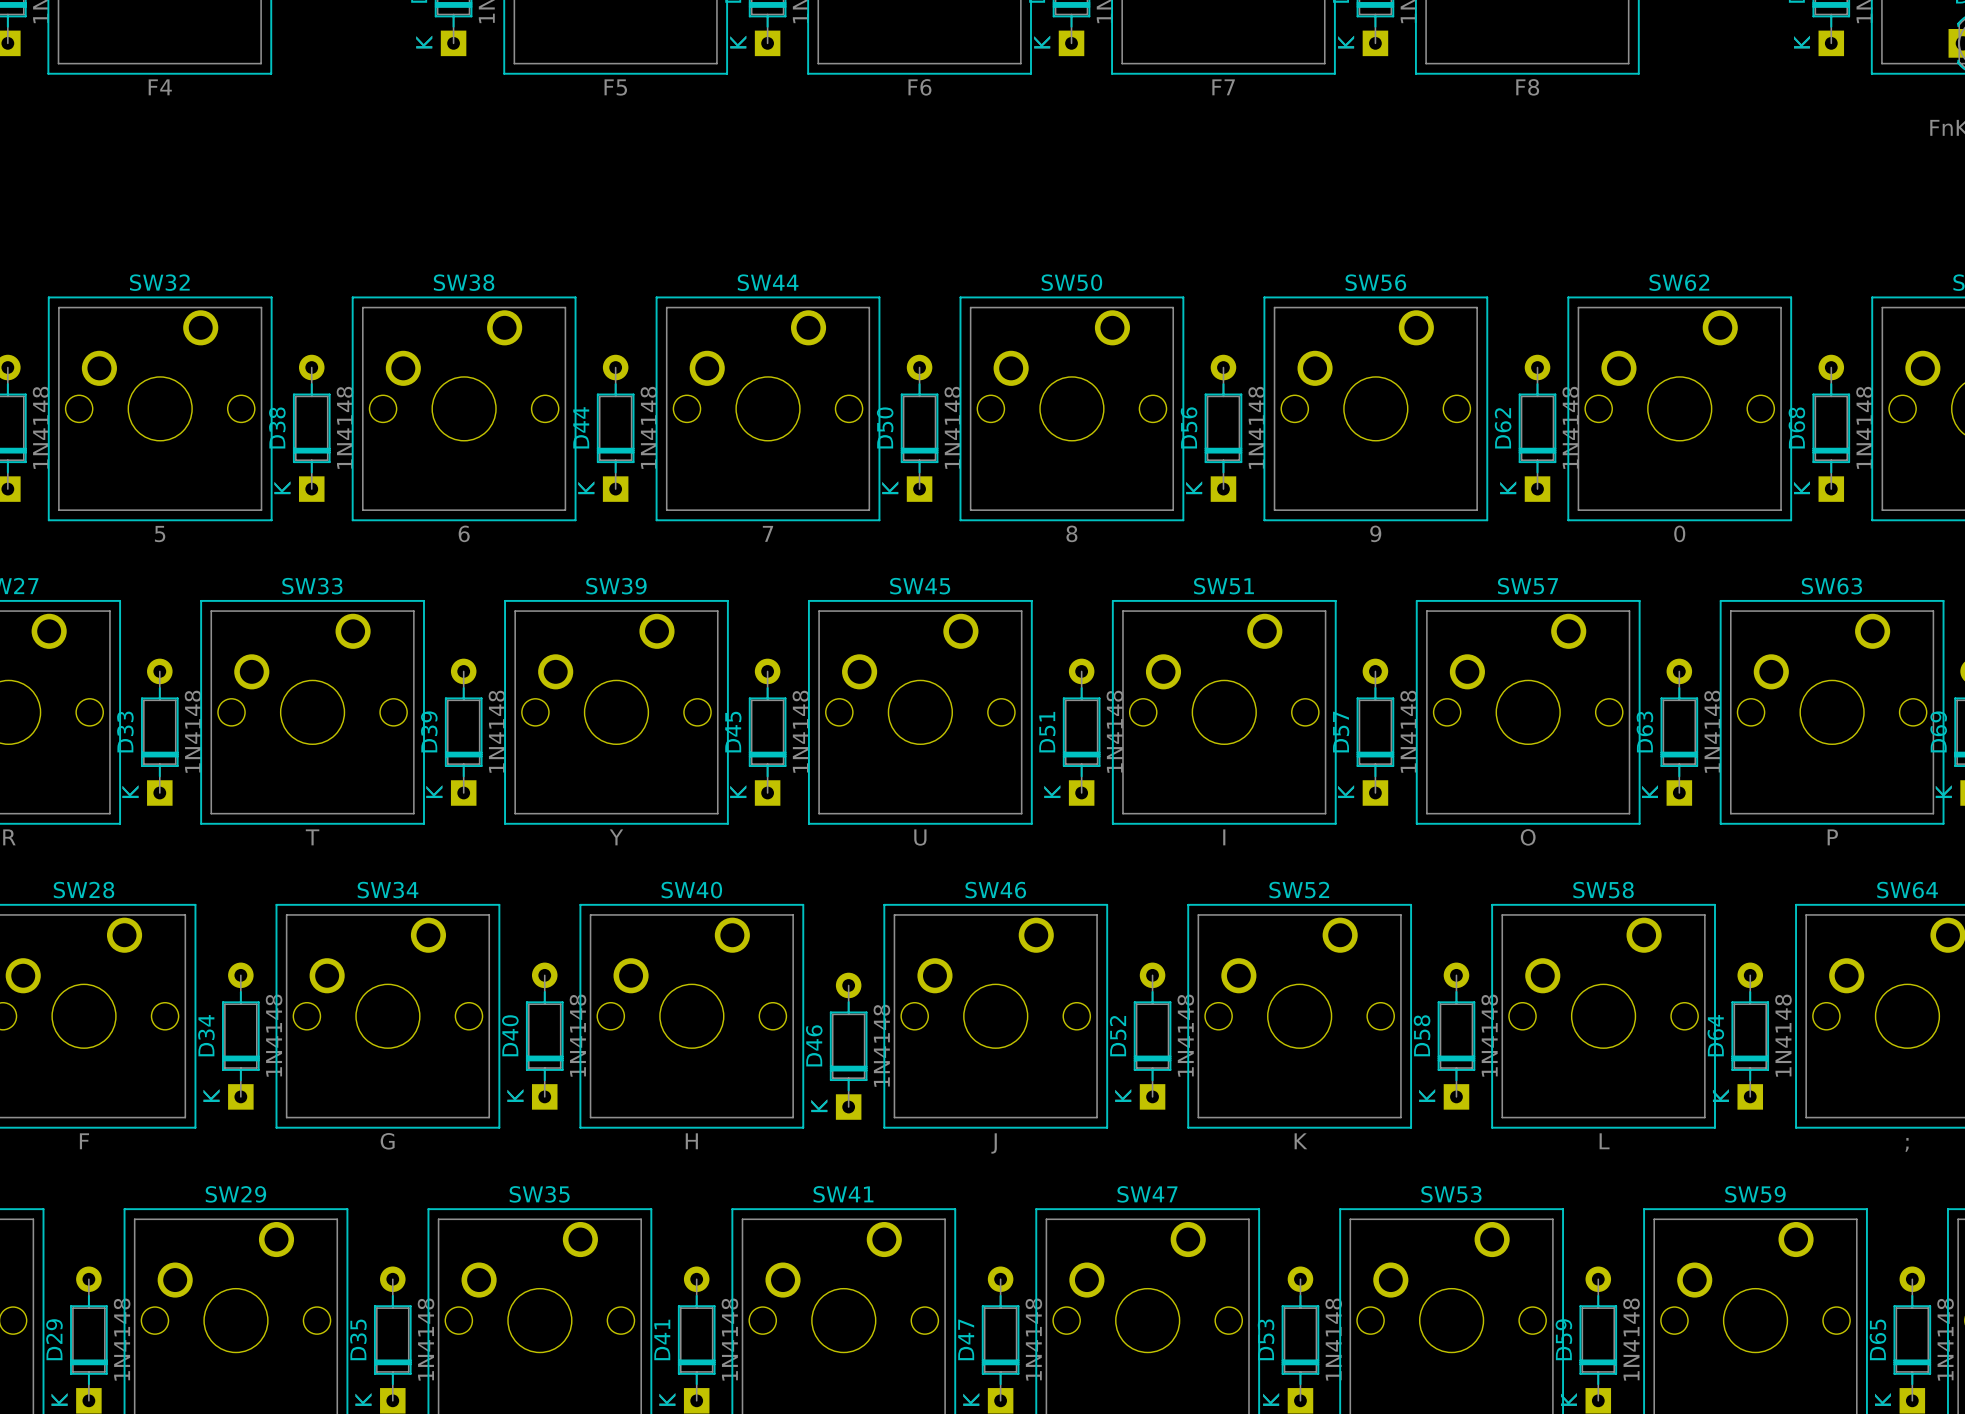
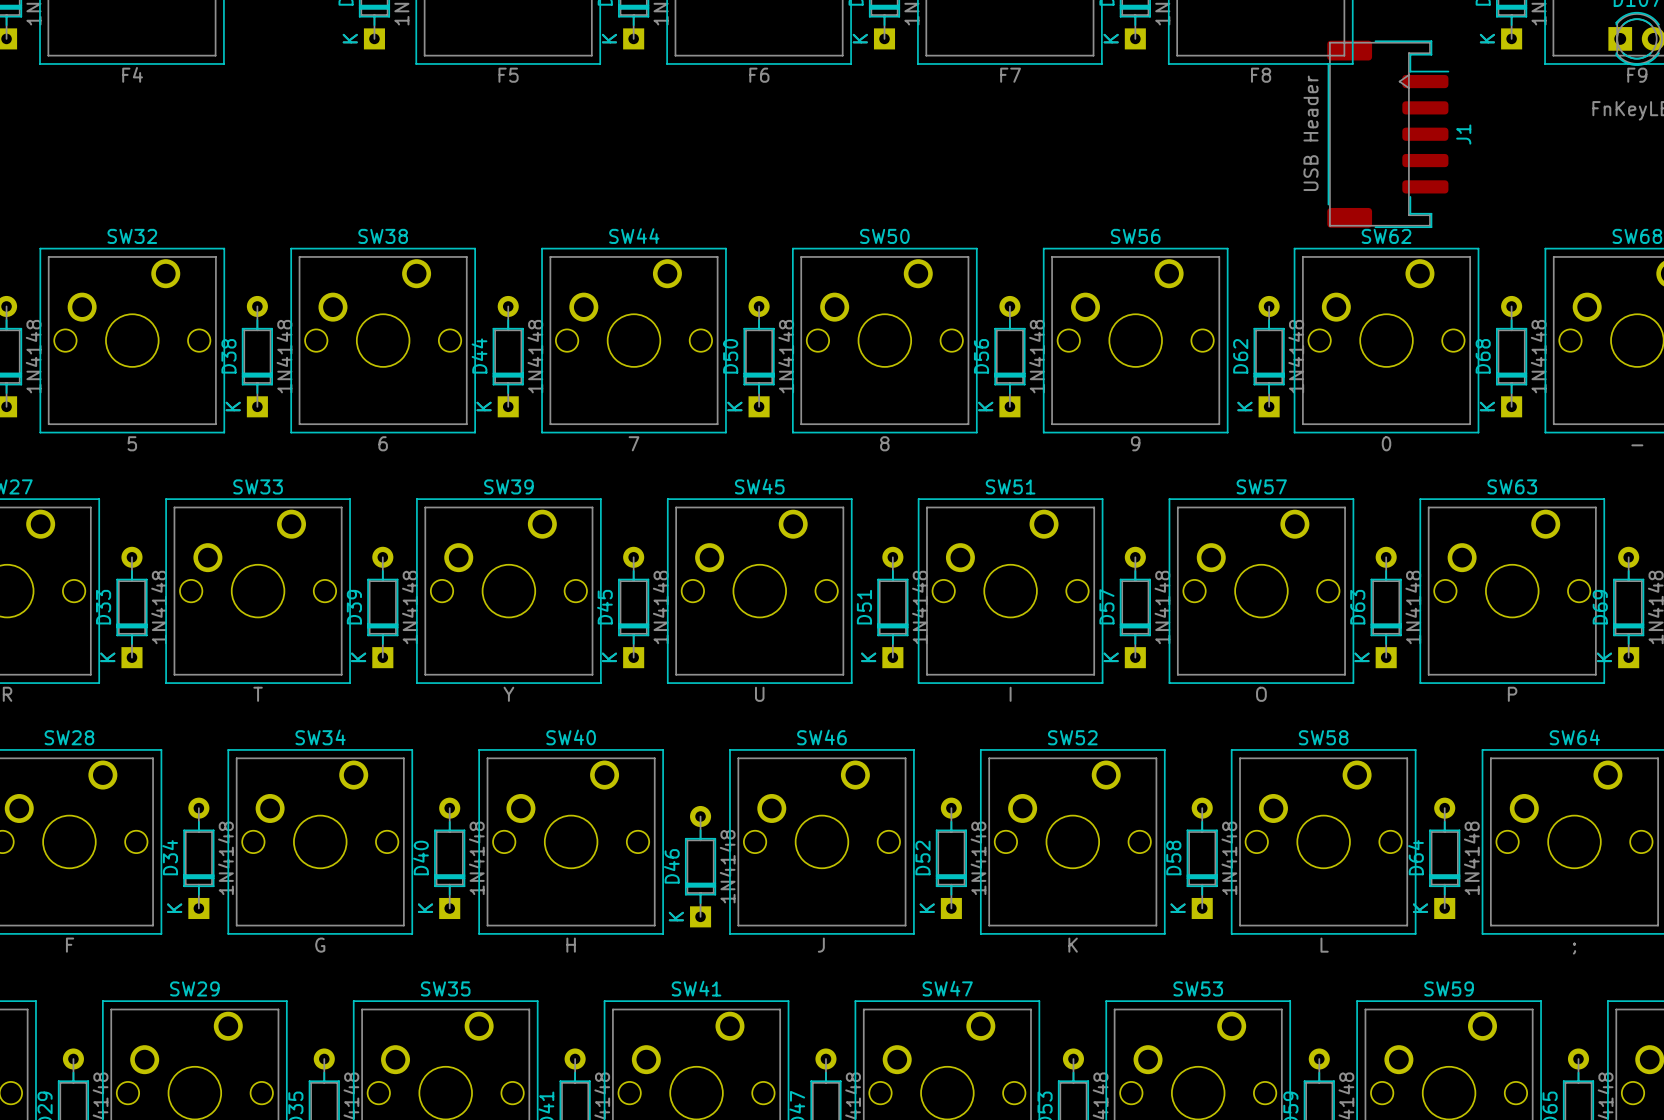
J1: none -> USB Header (1388, 134)

